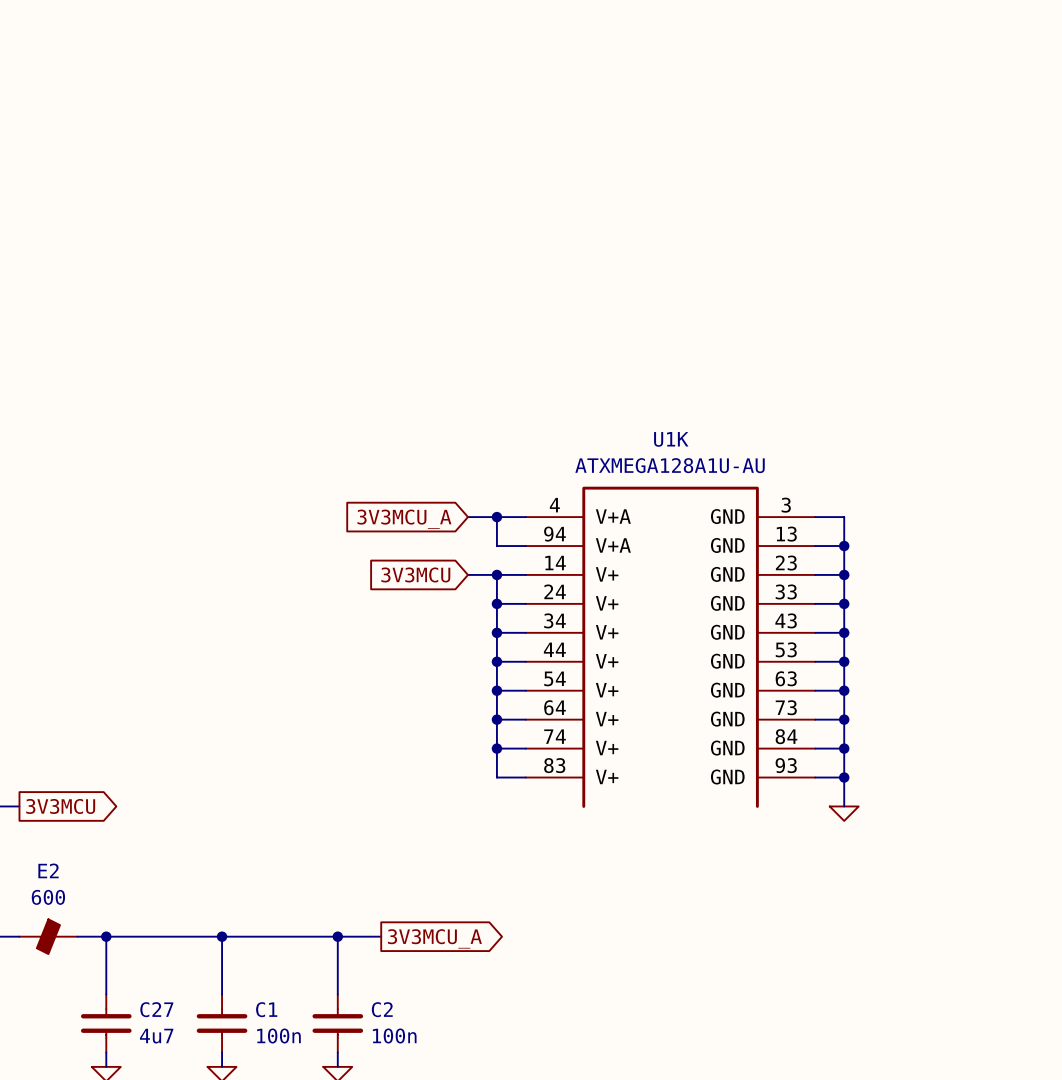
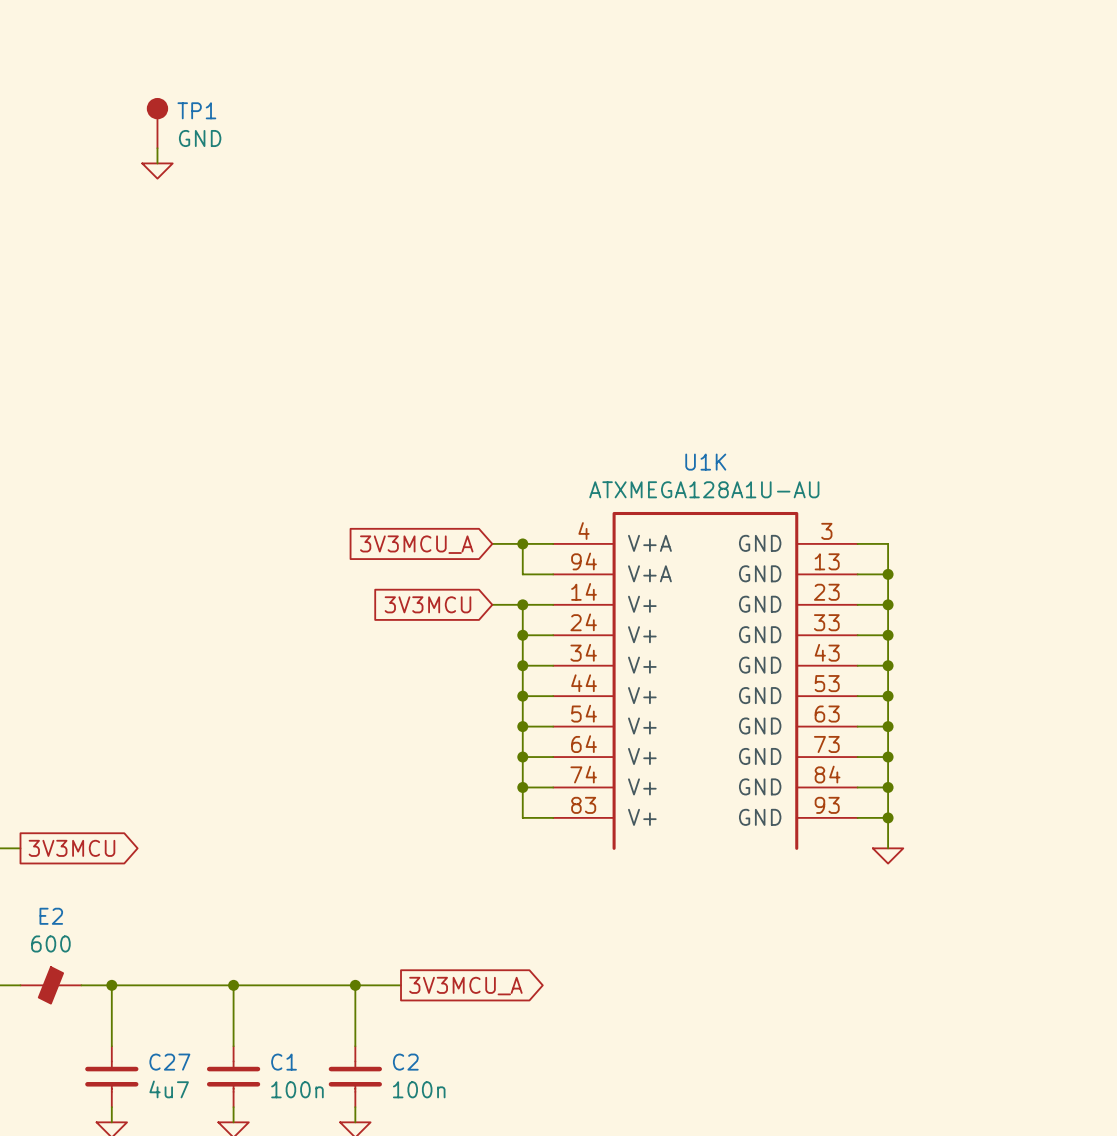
TP1: none -> GND (157, 123)
wire: none -> (157, 148) (157, 163)
power symbol: none -> (157, 171)

